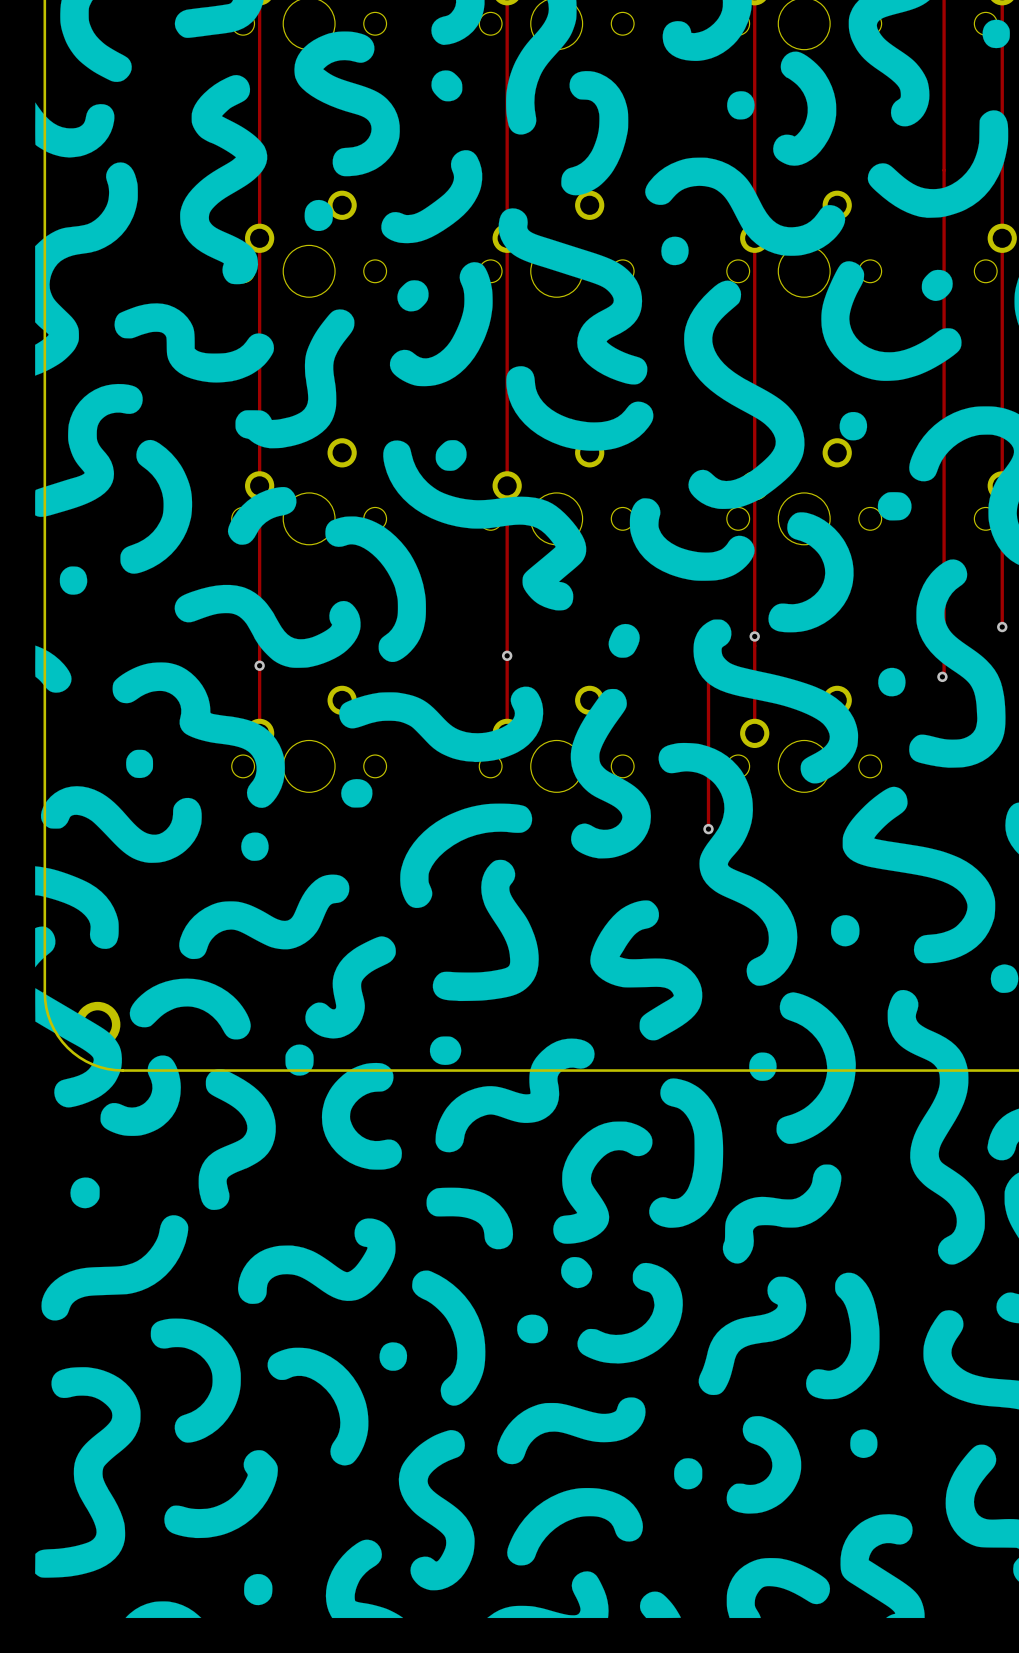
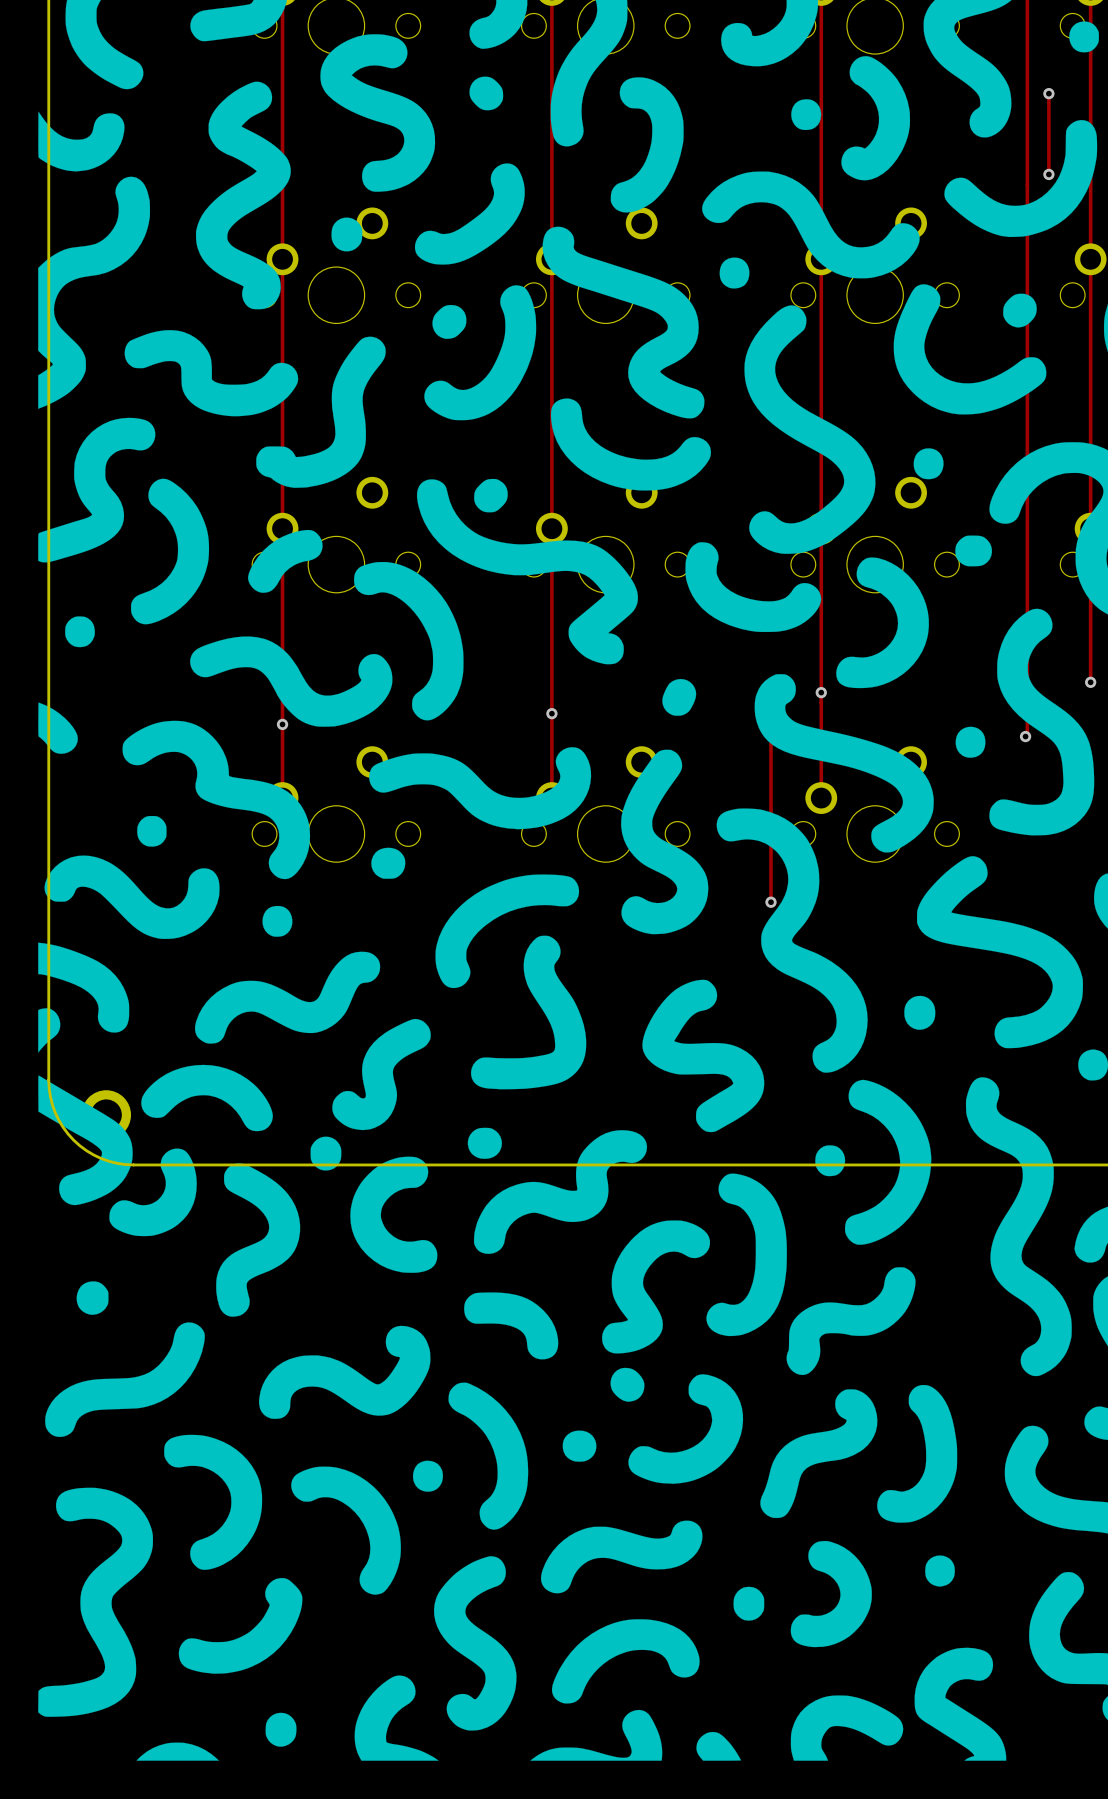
track: none -> (1048, 93) (1048, 174)
via: none -> (1048, 93)
via: none -> (1048, 174)

